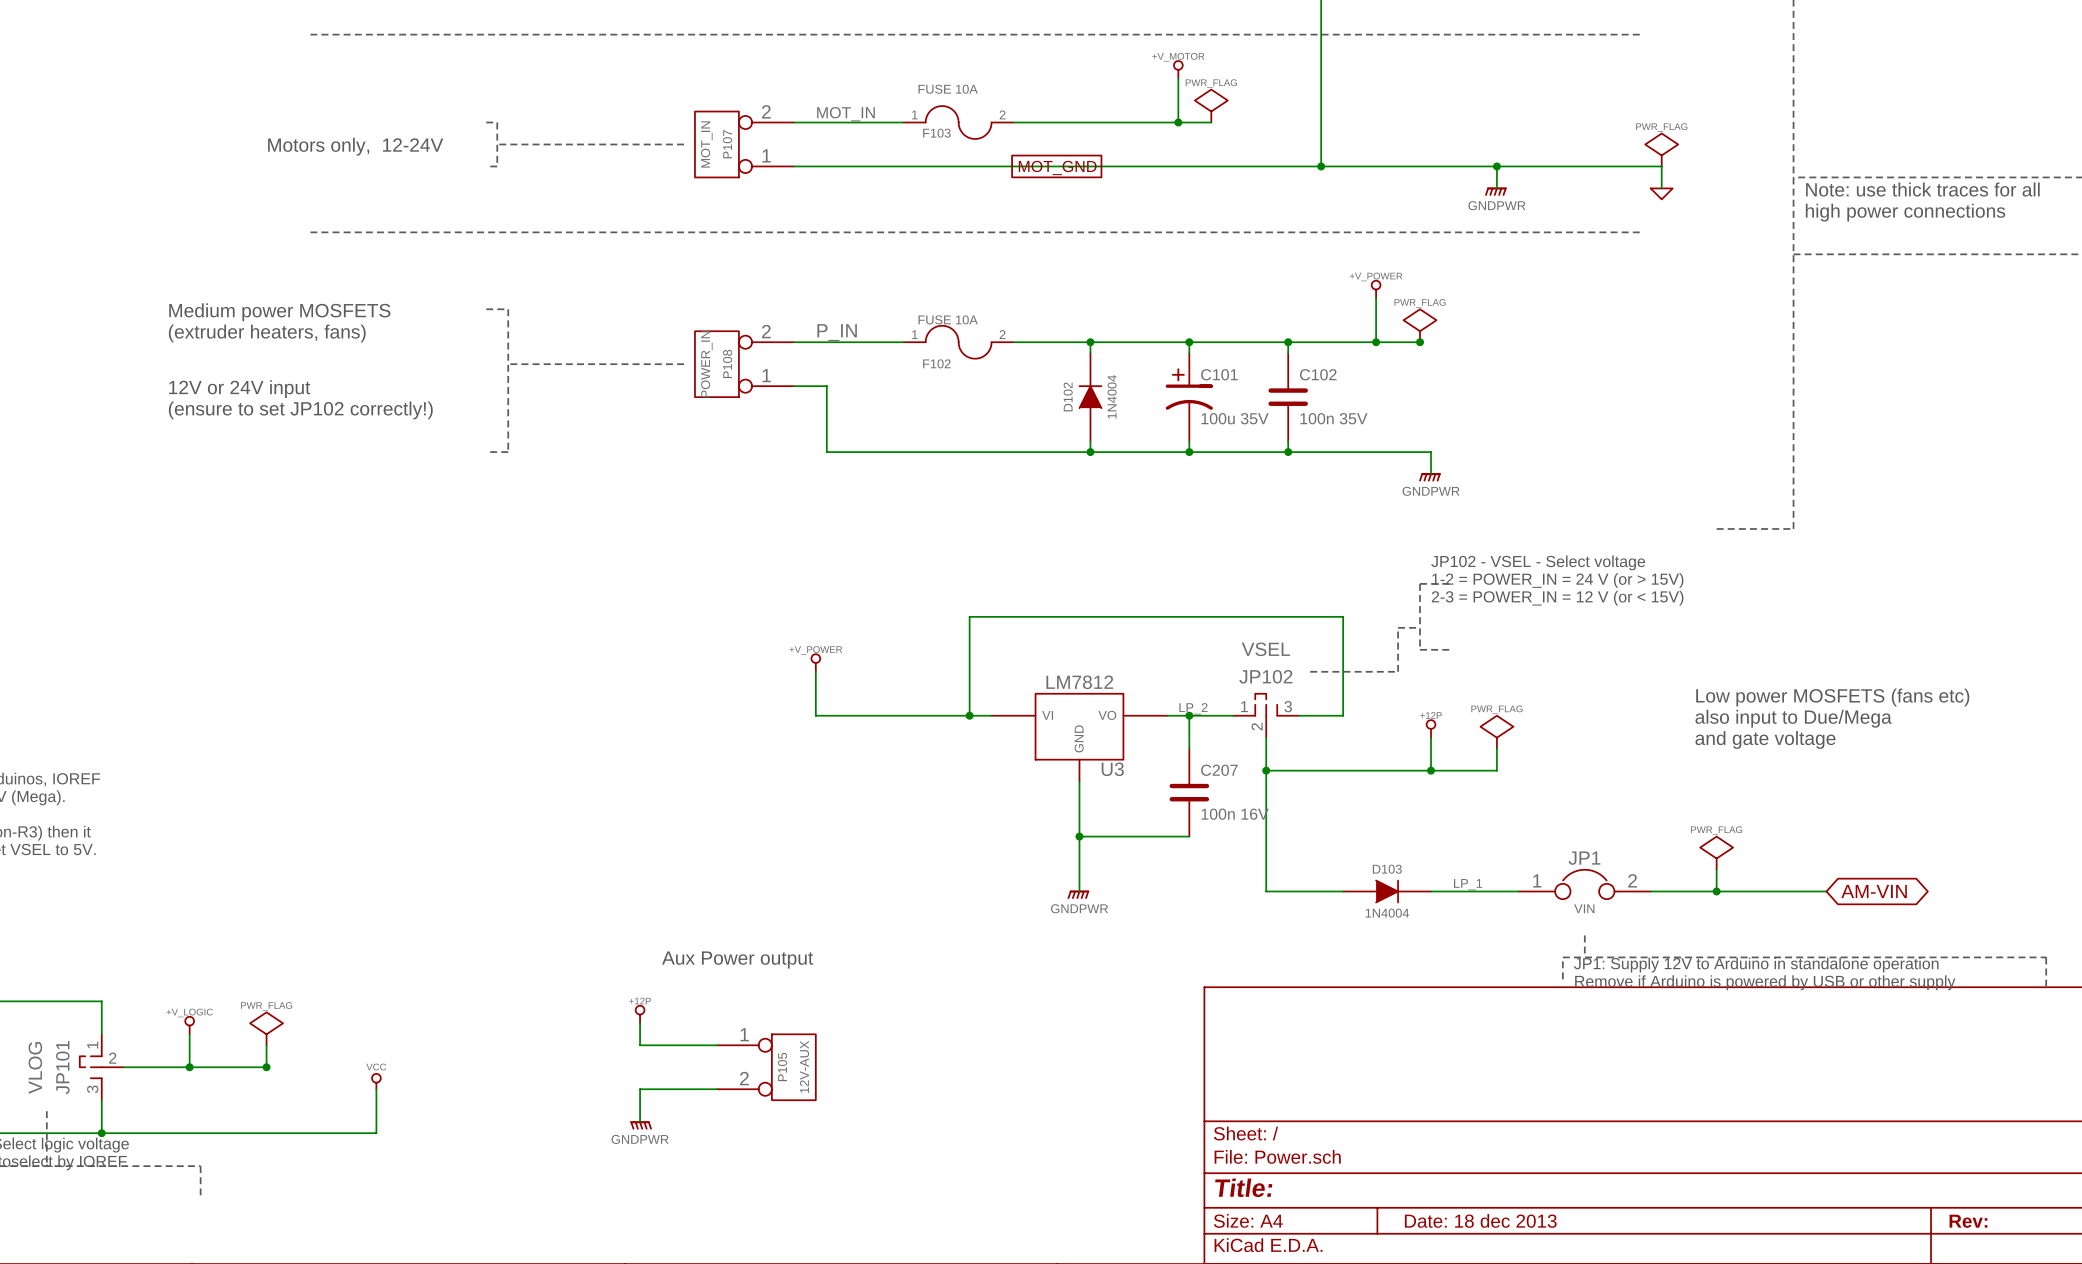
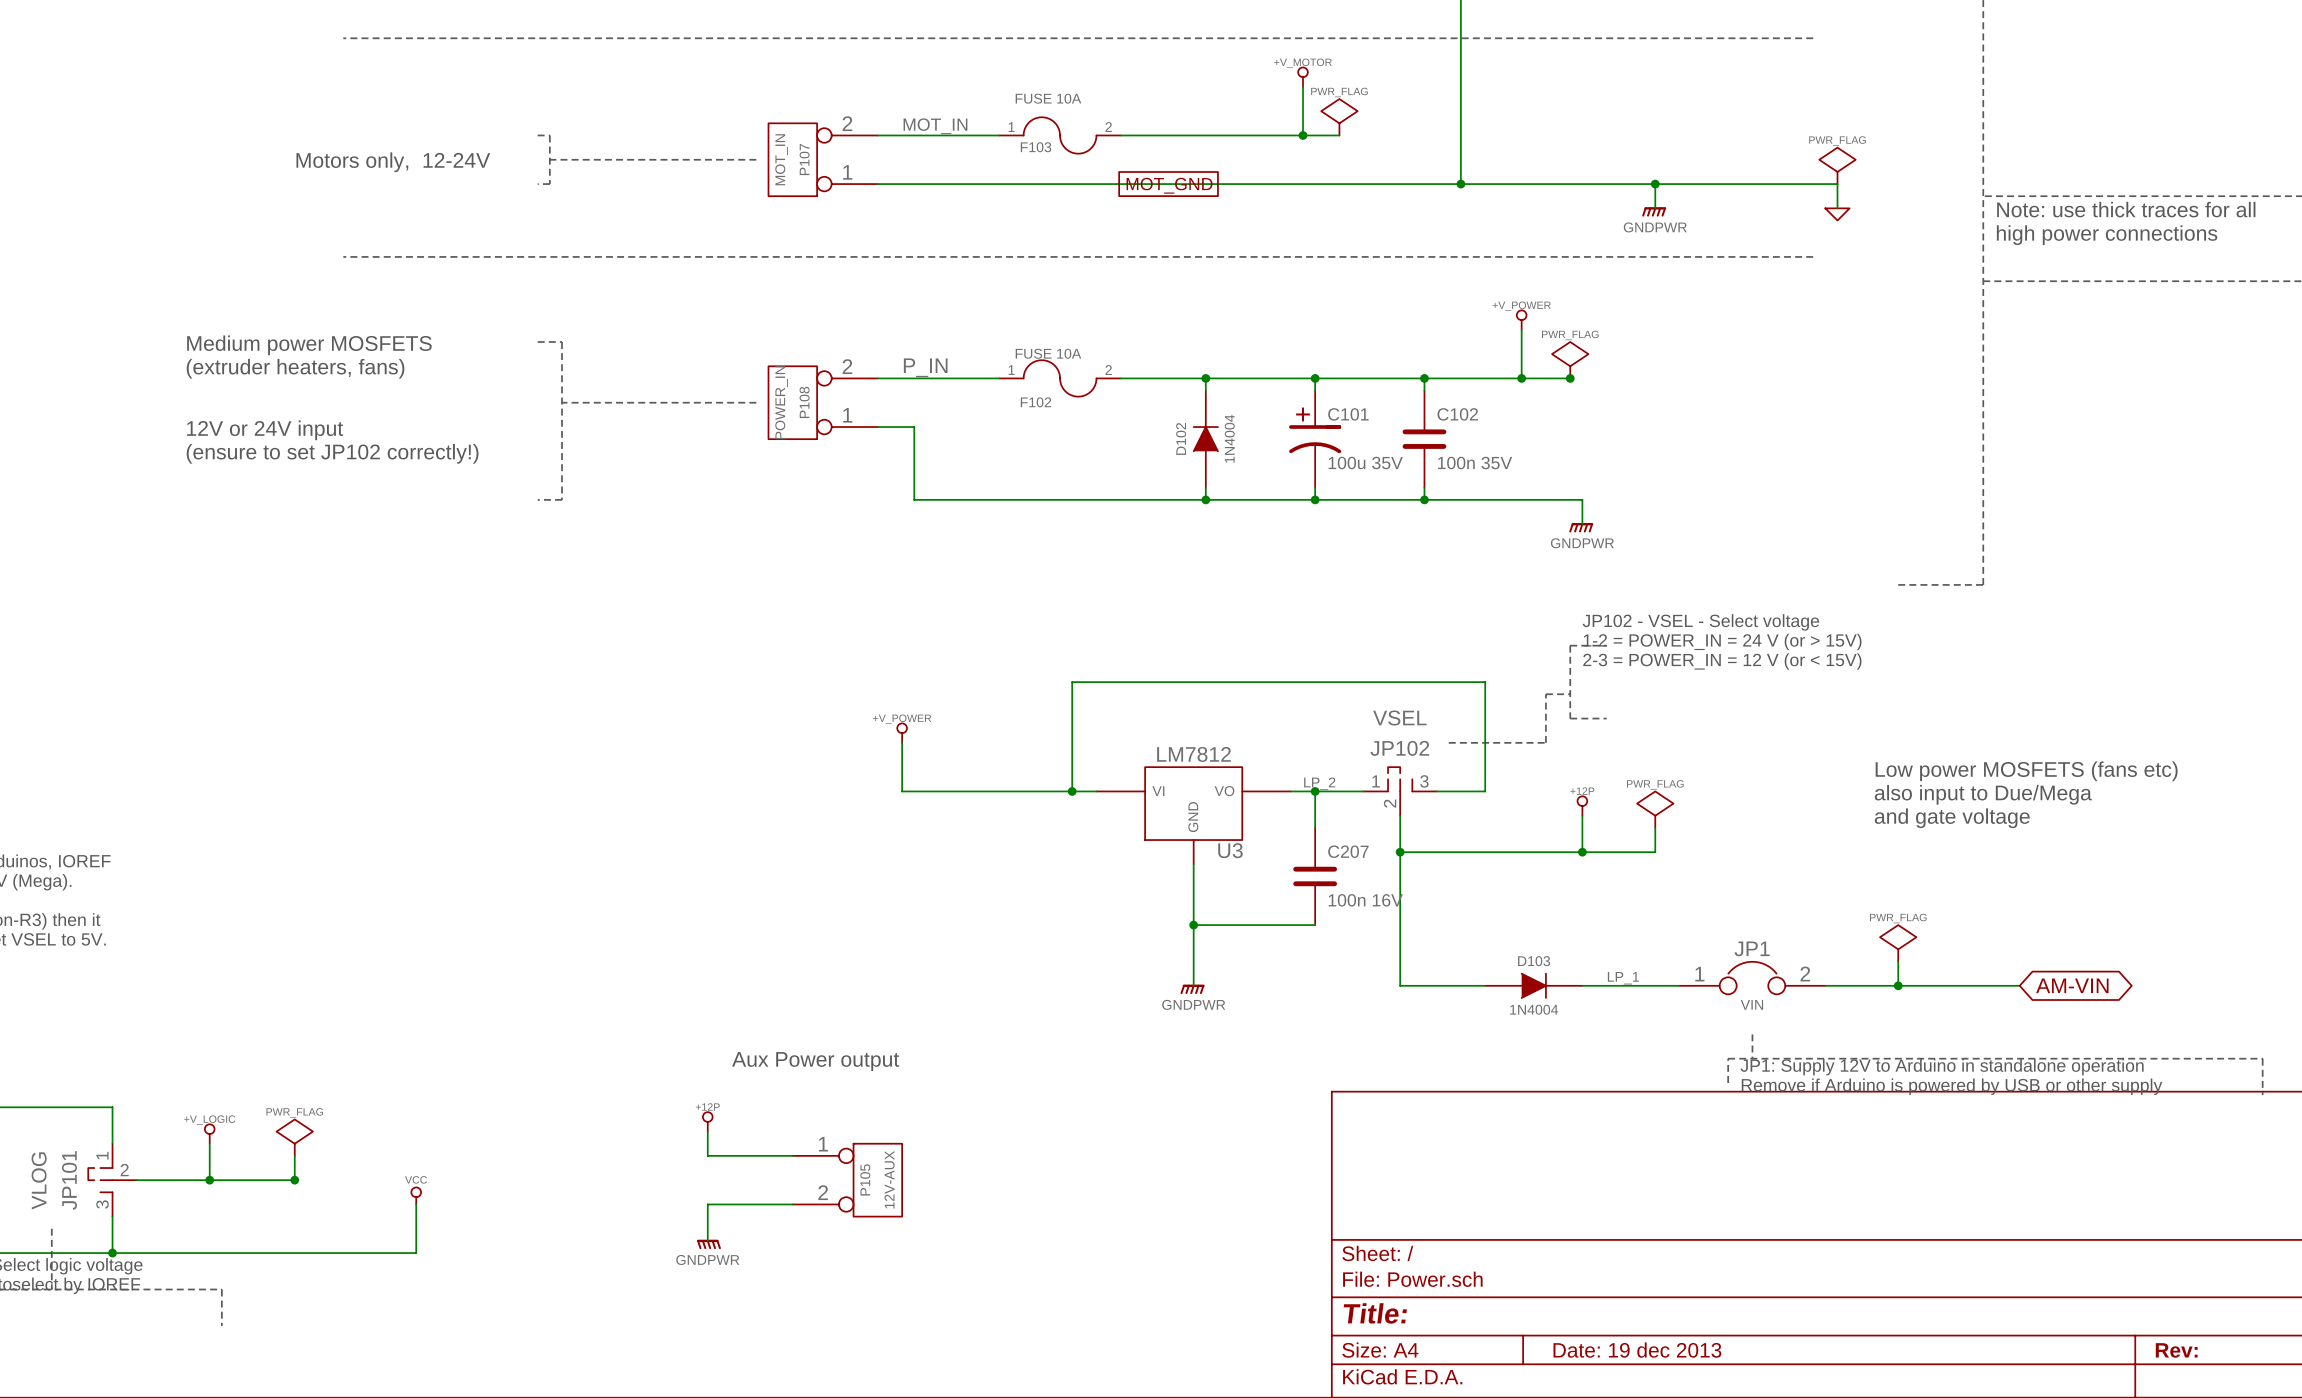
title block: Date: 18 dec 2013 (1480, 1220) -> Date: 19 dec 2013 (1637, 1350)

